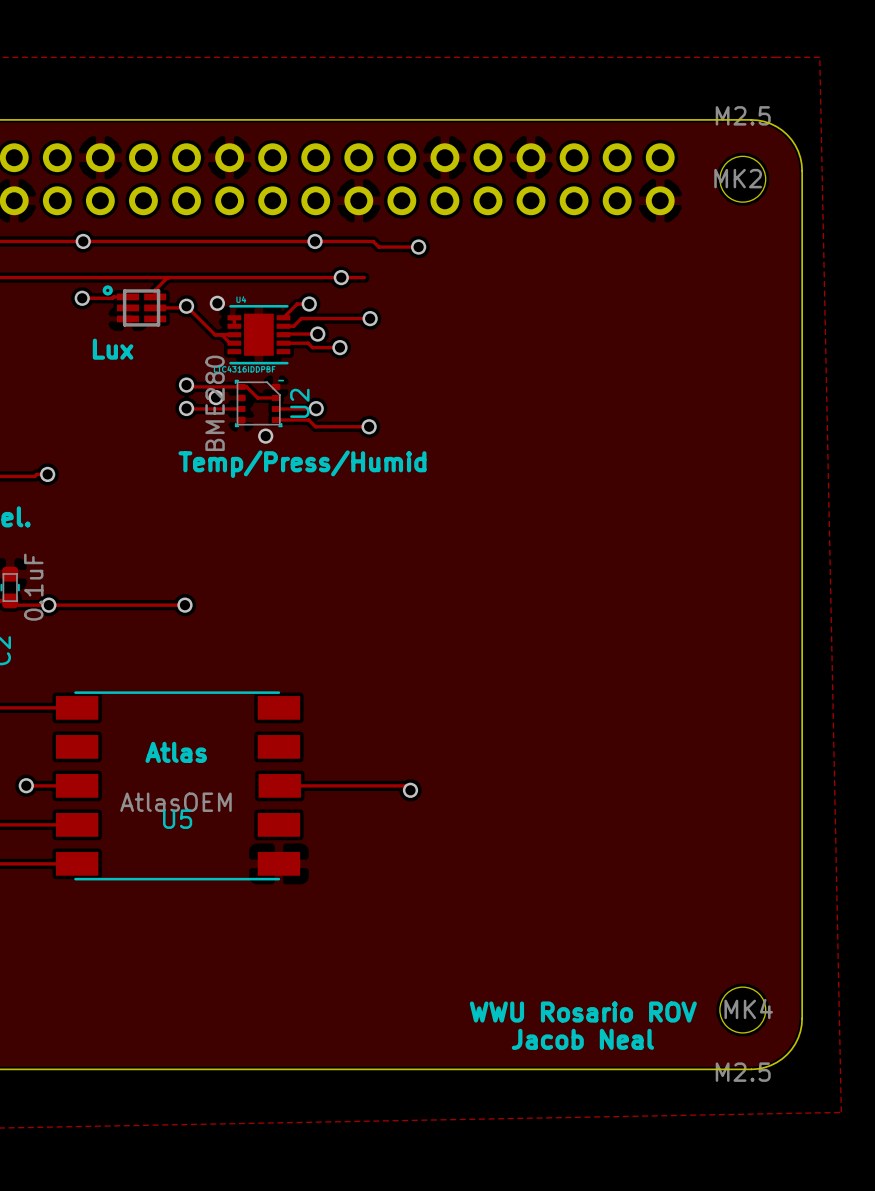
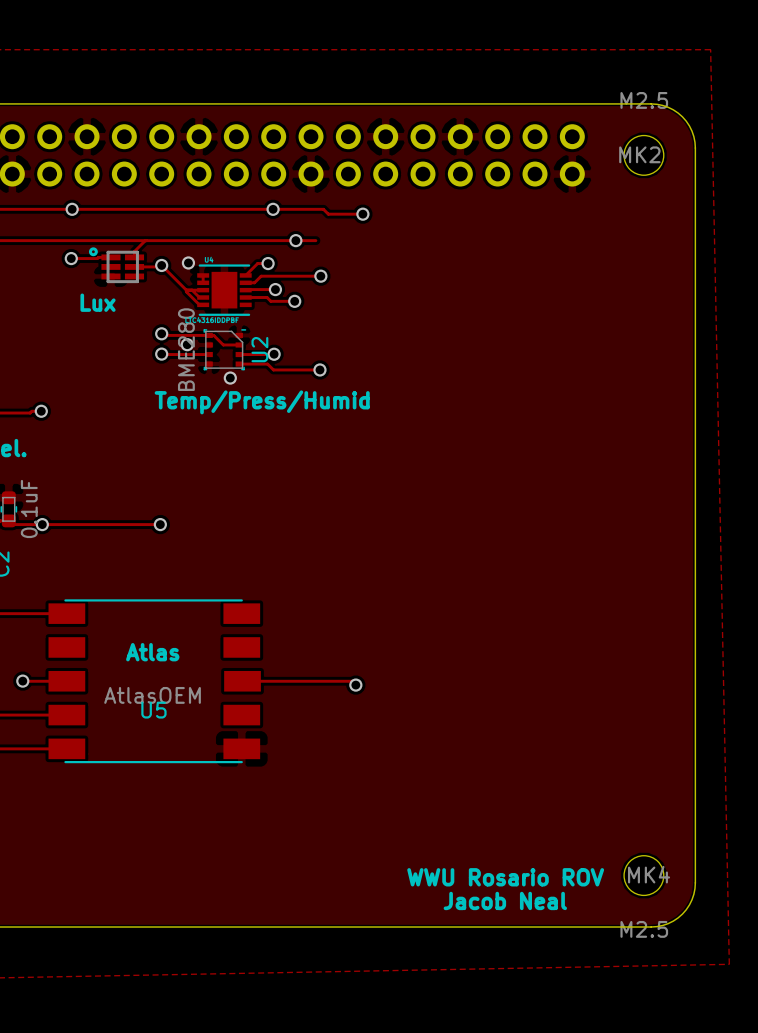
track: none -> (186, 290) (199, 304) (203, 304)

